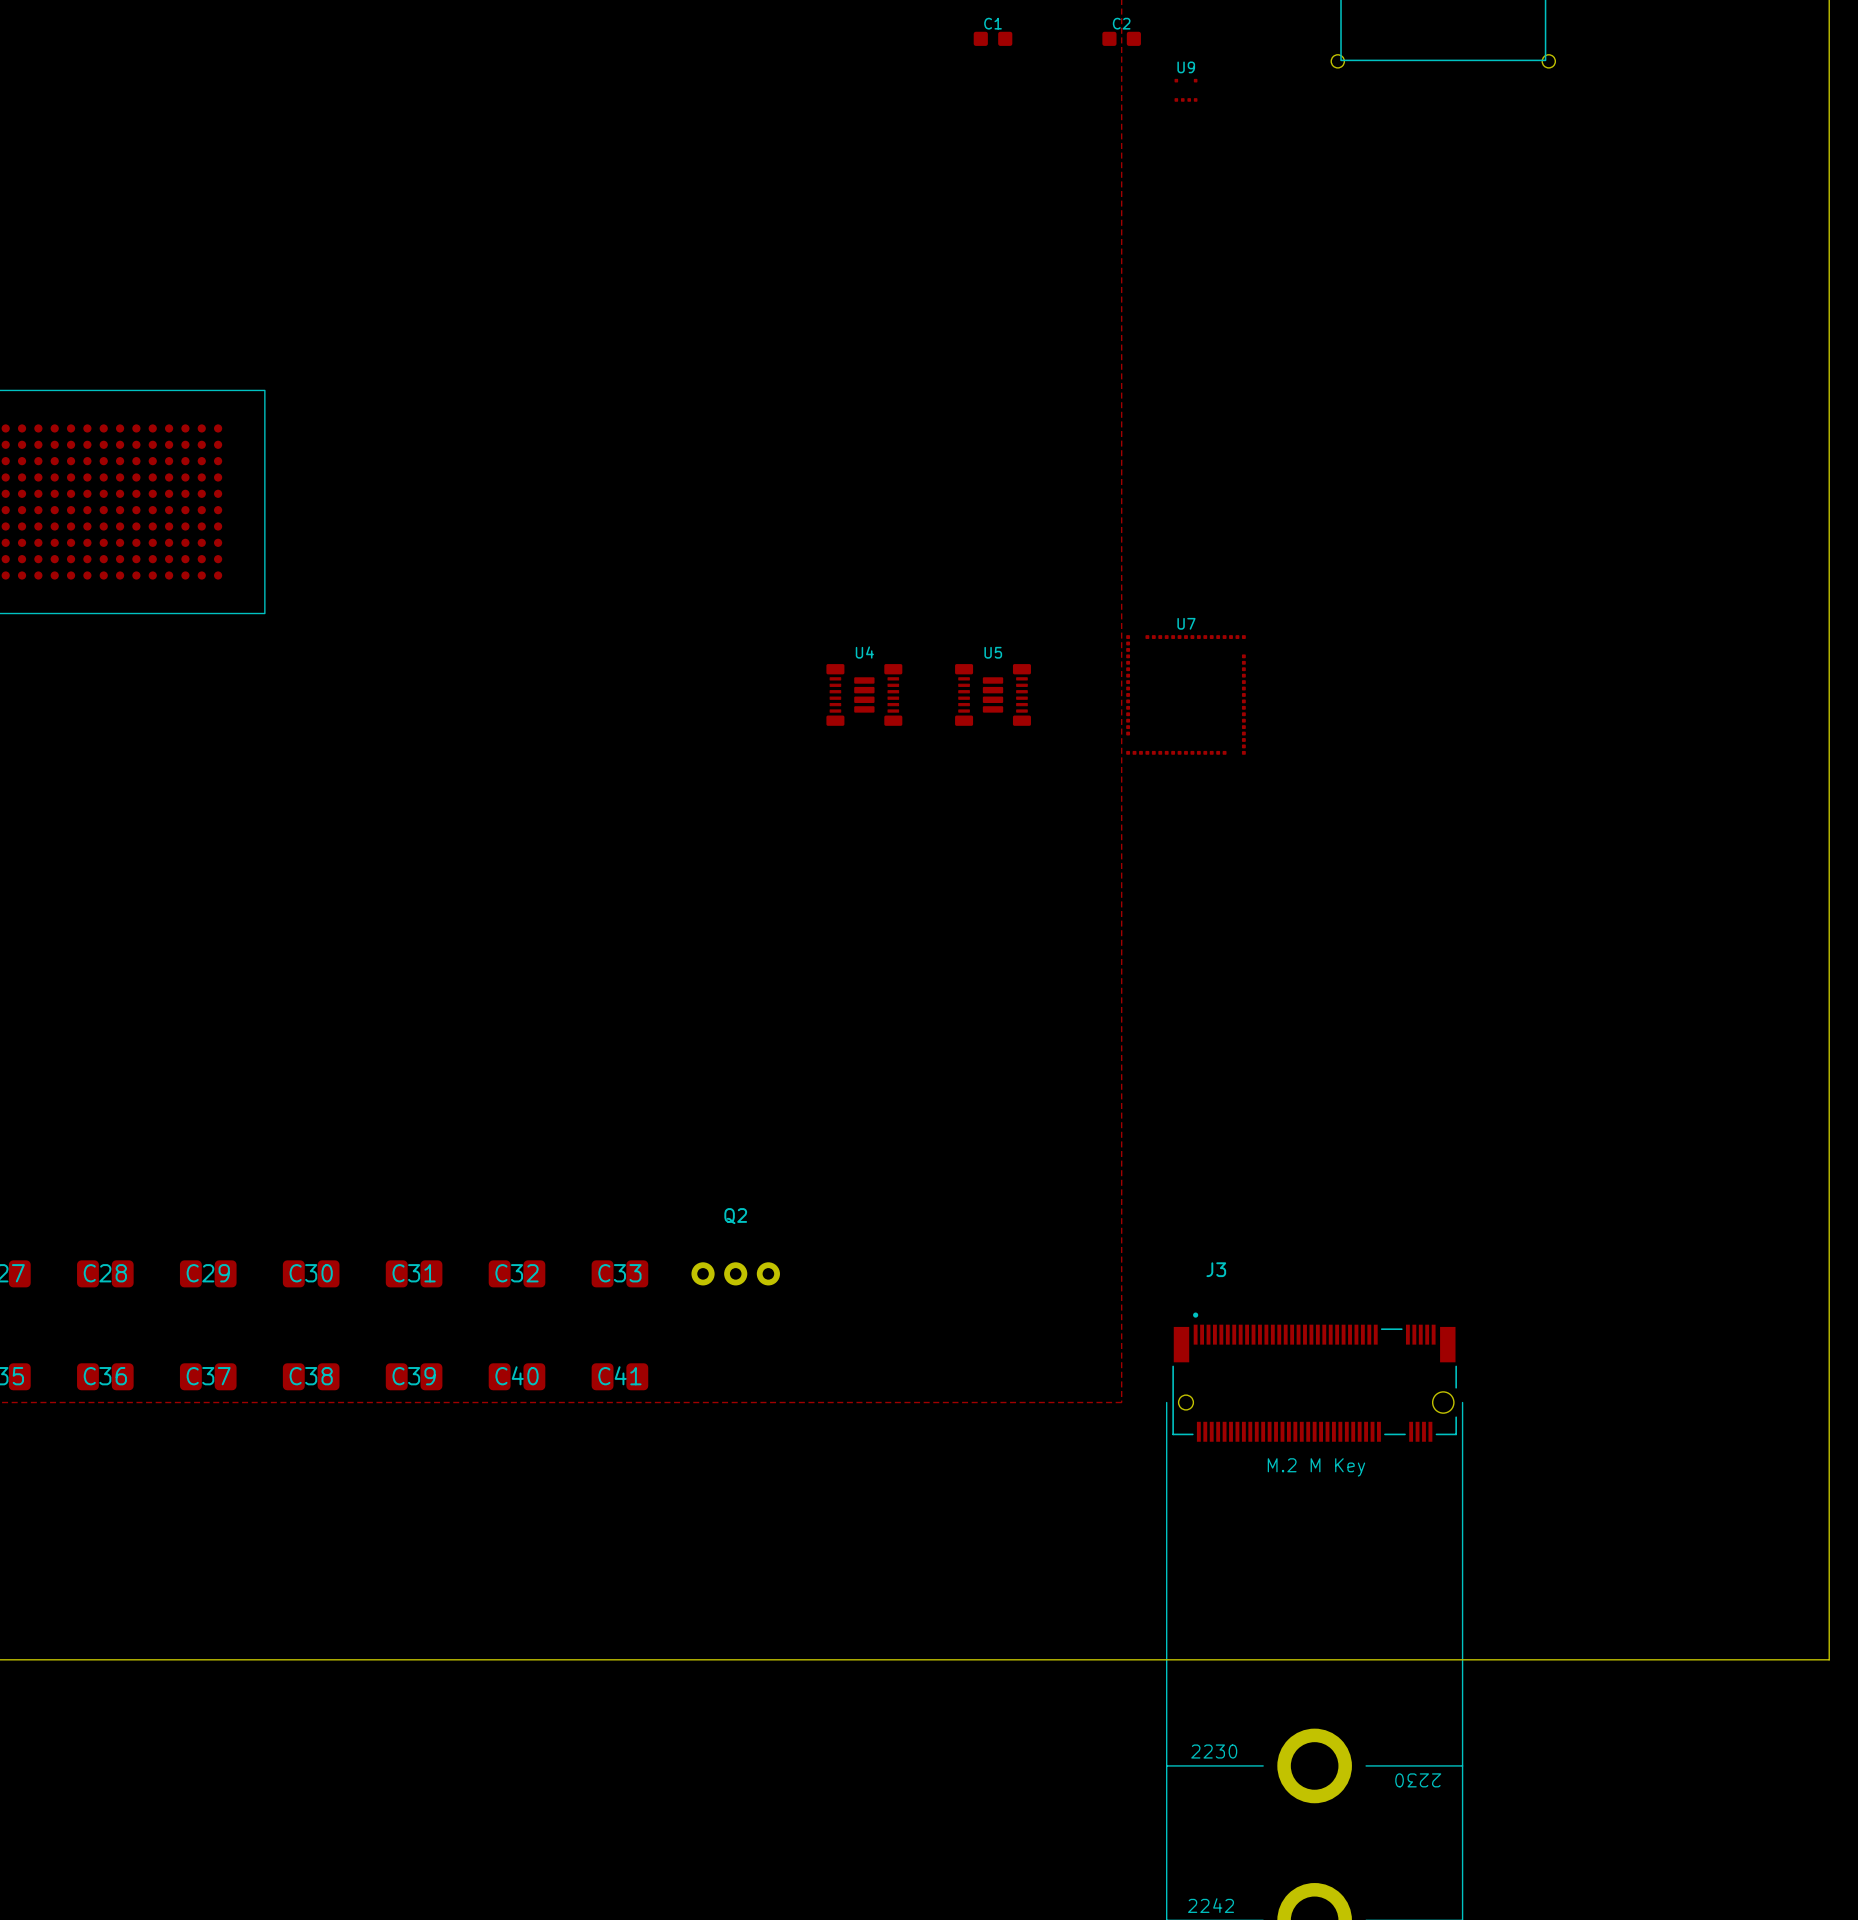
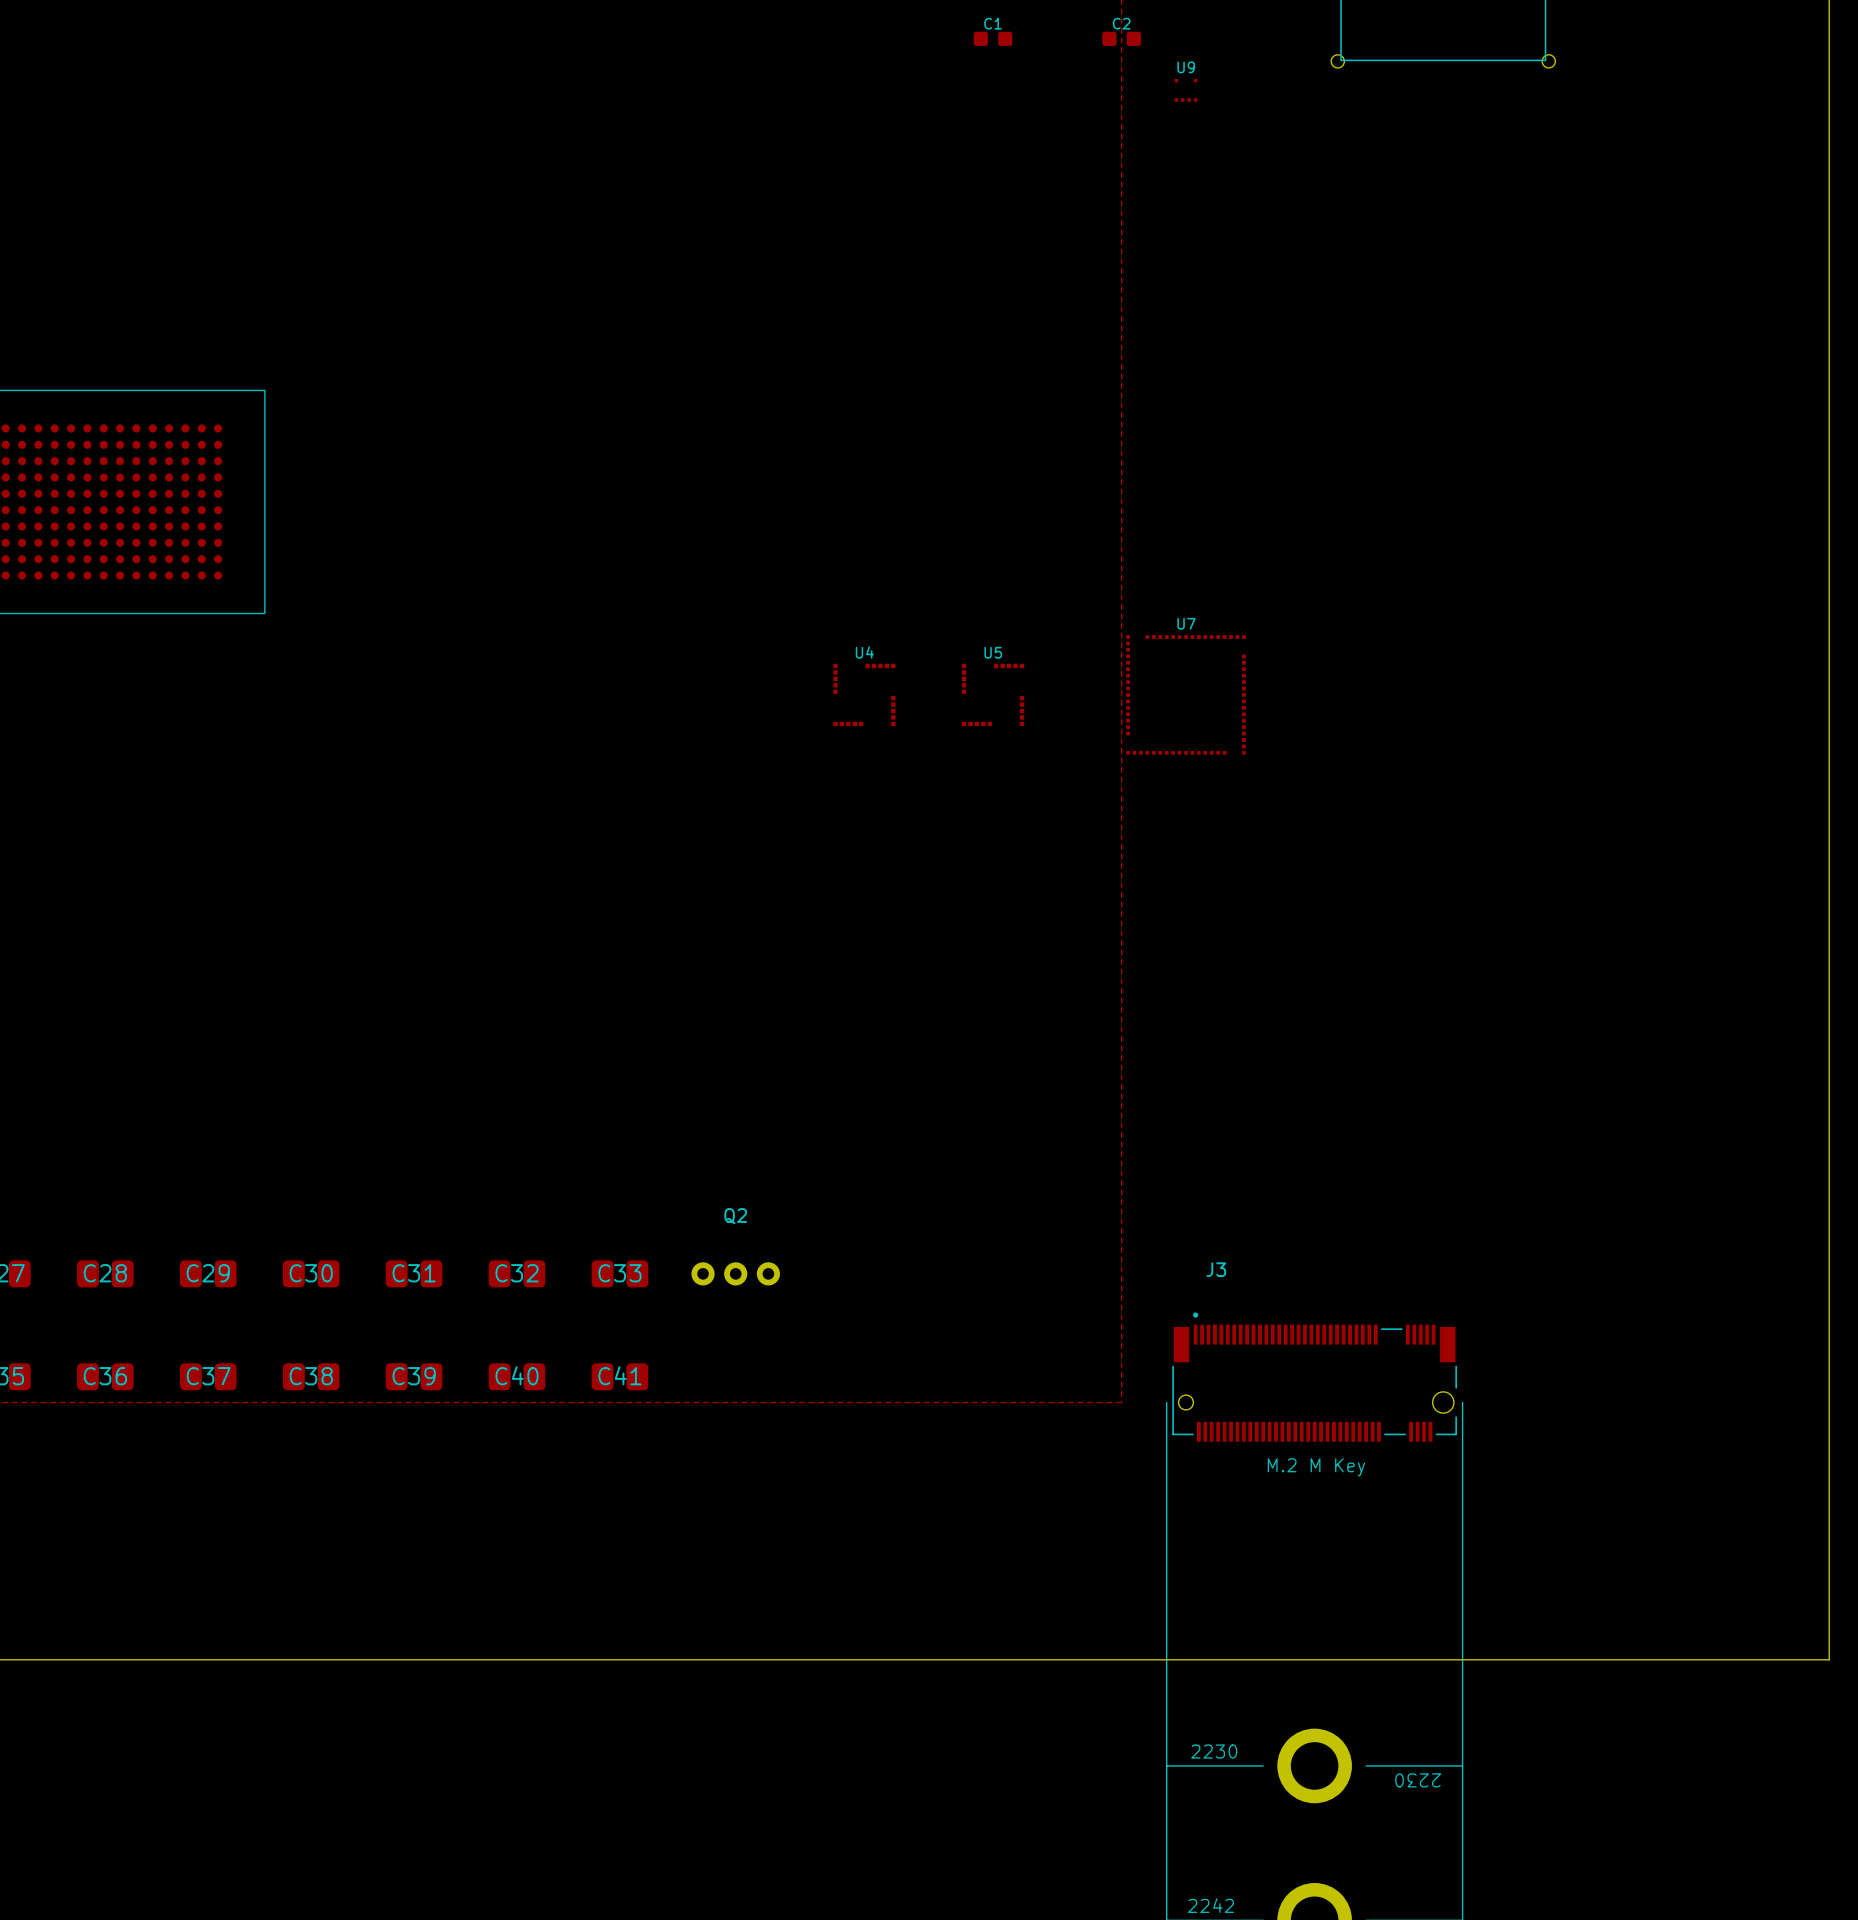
U4 footprint: [826, 664, 903, 726] -> [833, 663, 896, 727]
U5 footprint: [955, 664, 1031, 726] -> [961, 663, 1025, 727]

